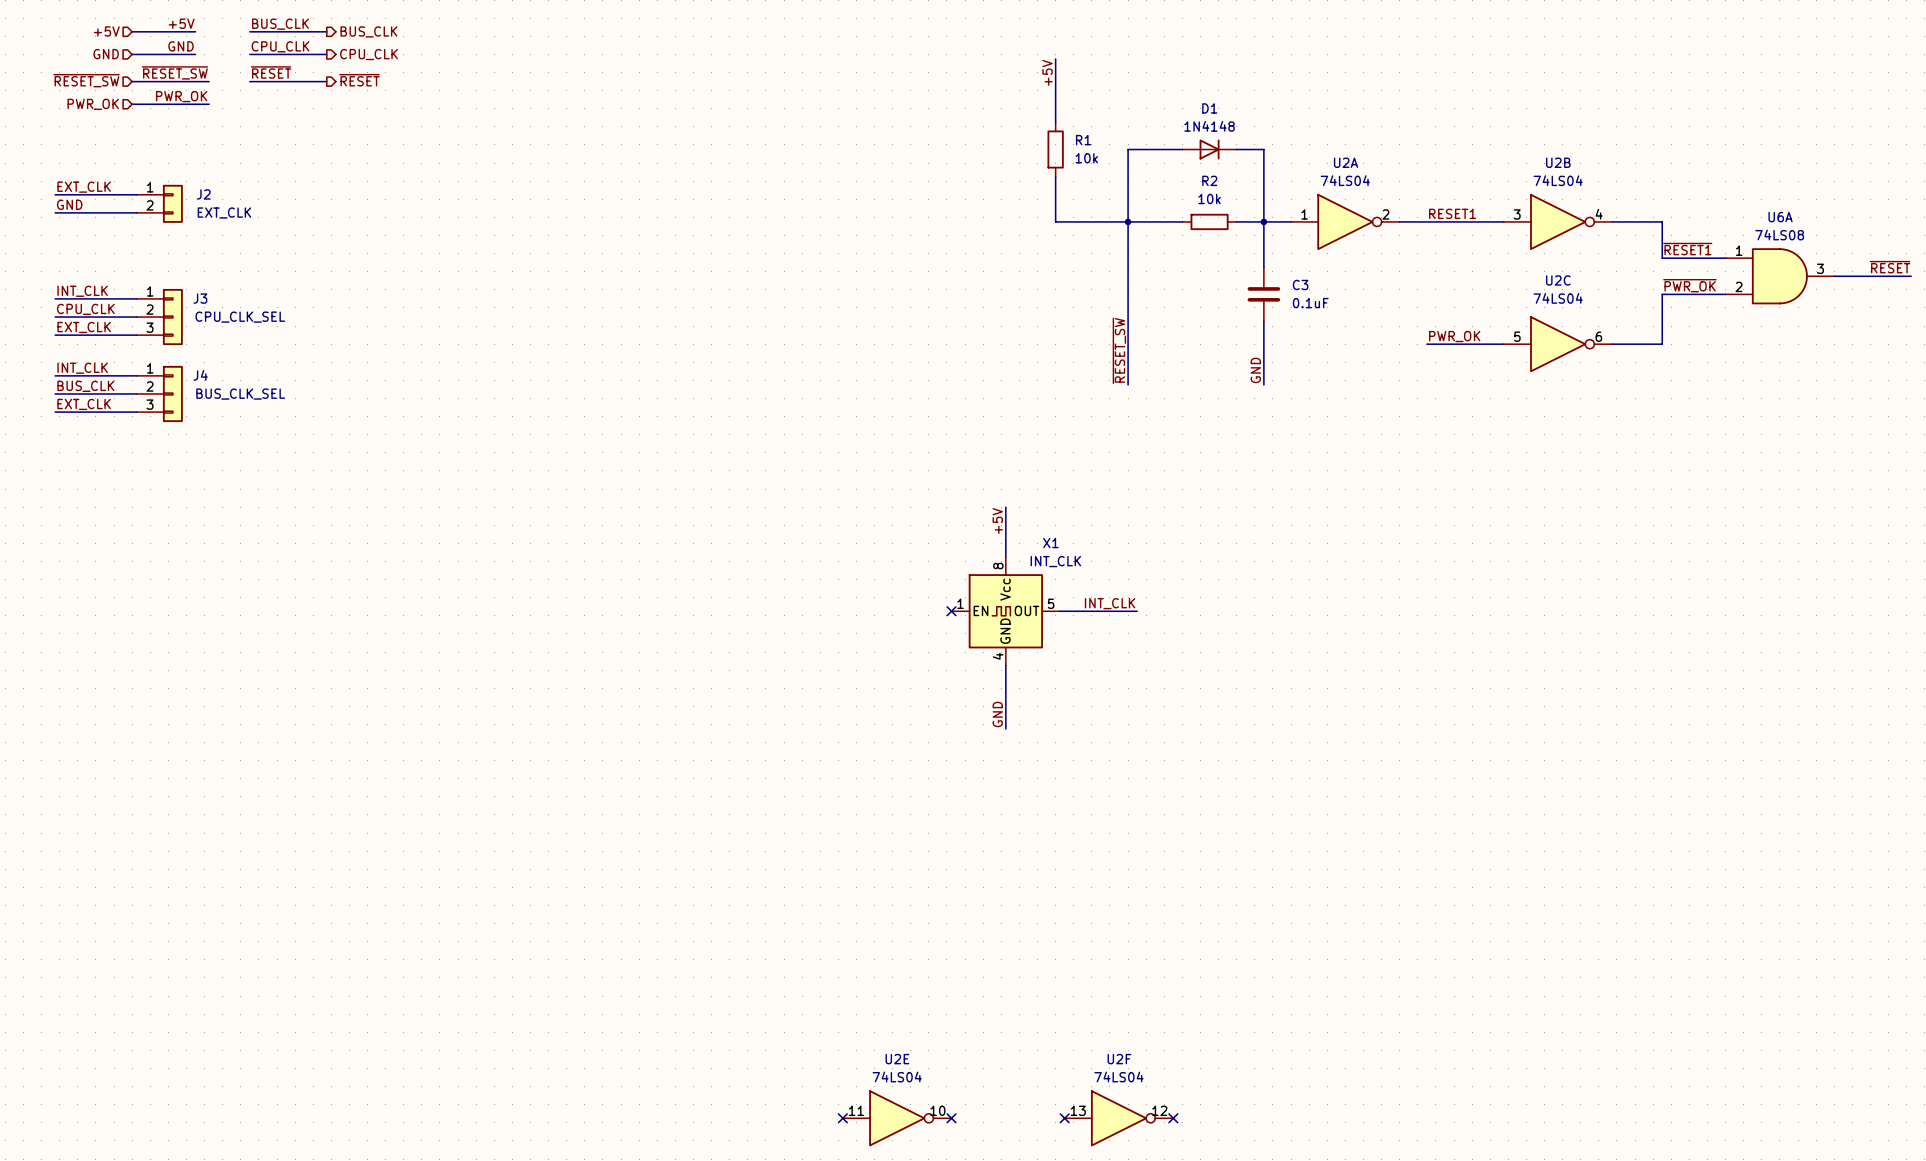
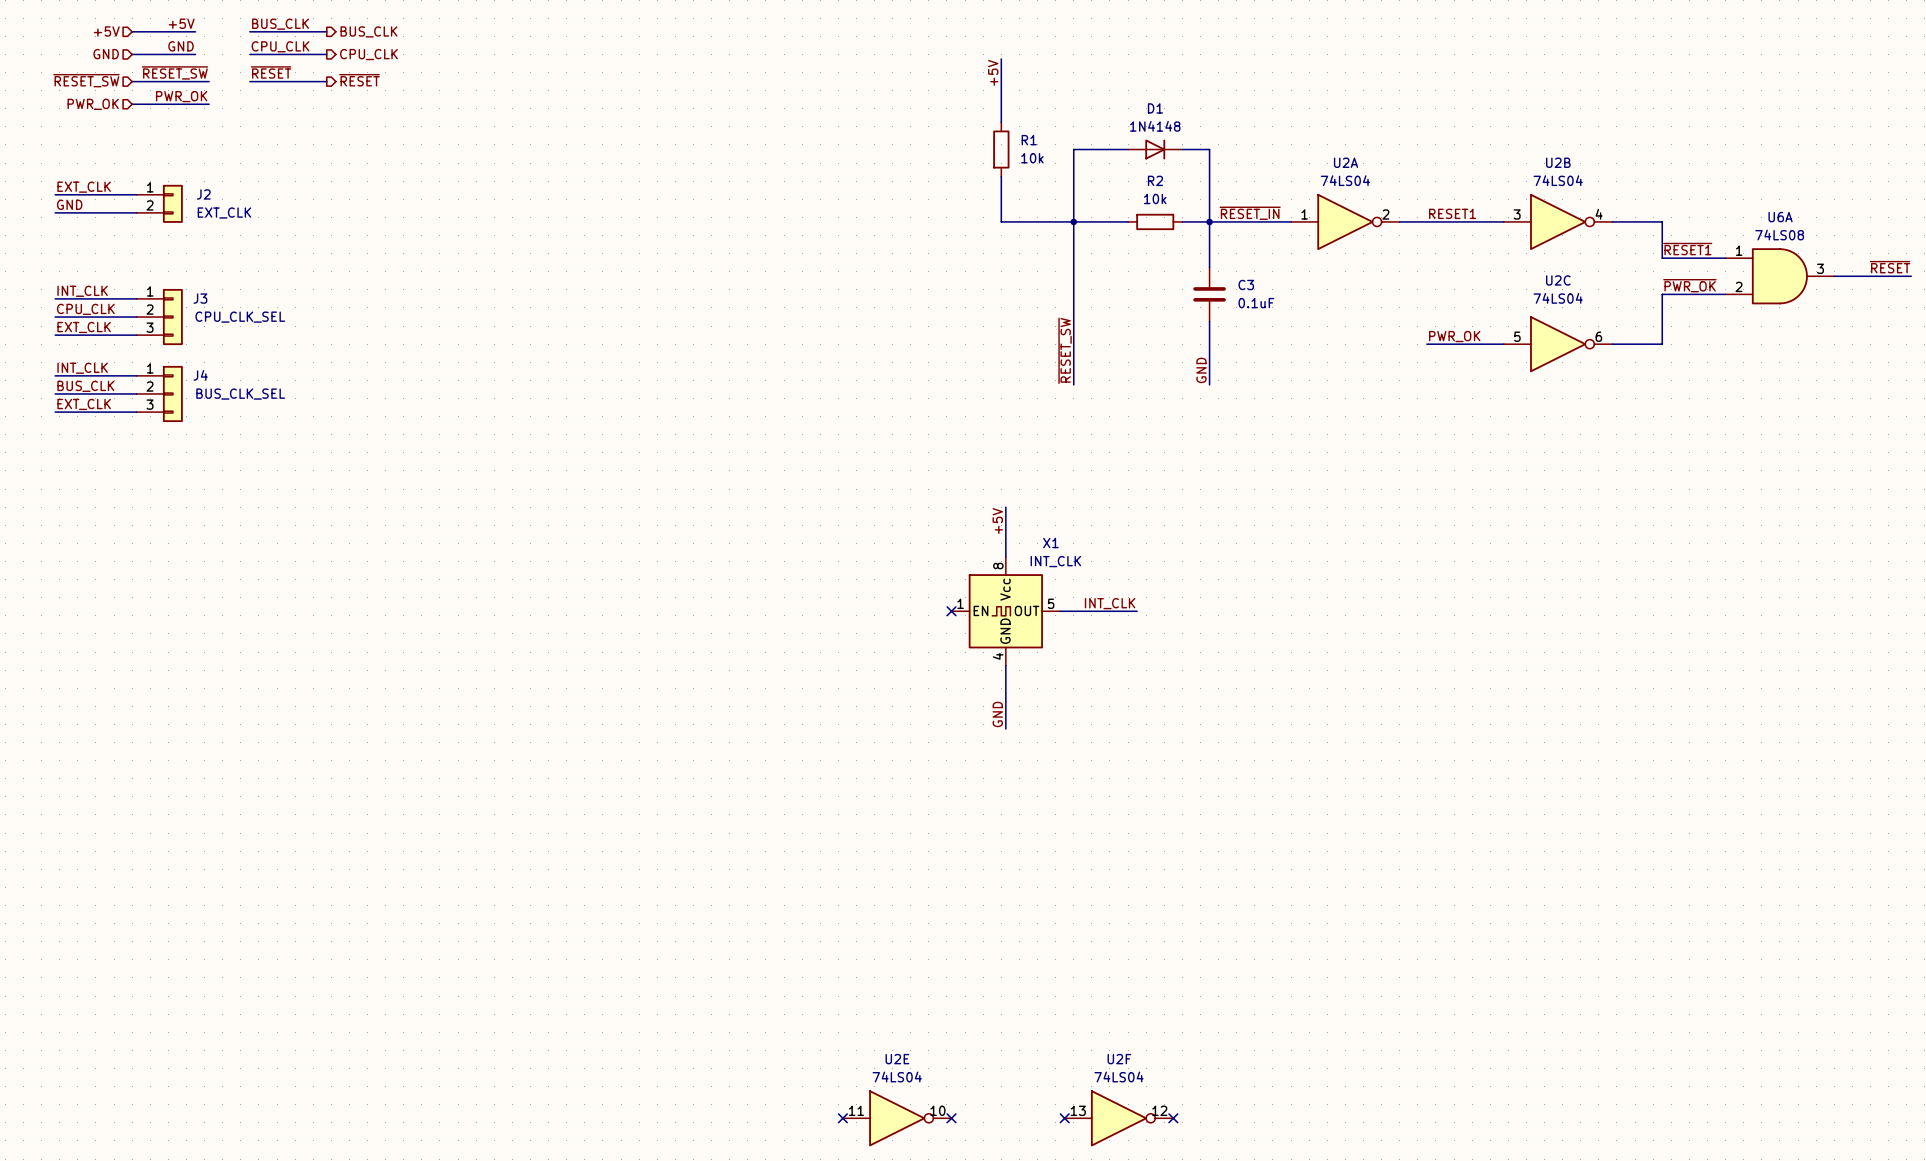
wire: (1055, 58) (1055, 122) -> (1001, 58) (1001, 122)
label position: +5V (1047, 72) -> +5V (993, 72)
R1 position: (1055, 149) -> (1001, 149)
wire: none -> (1128, 149) (1073, 149) (1073, 384)
wire: (1182, 149) (1128, 149) (1128, 384) -> (1182, 149) (1209, 149) (1209, 267)
D1 position: (1209, 149) -> (1155, 149)
wire: (1236, 149) (1263, 149) (1263, 267) -> none
wire: (1055, 176) (1055, 221) -> (1001, 176) (1001, 221) (1055, 221)
label: none -> ~{RESET_IN} (1250, 213)
junction: none -> (1073, 221)
wire: (1128, 221) (1182, 221) -> (1236, 221) (1182, 221)
junction: (1128, 221) -> none
junction: none -> (1209, 221)
R2 position: (1209, 221) -> (1155, 221)
junction: (1263, 221) -> none
C3 position: (1263, 294) -> (1209, 294)
wire: (1263, 321) (1263, 384) -> (1209, 321) (1209, 384)
label position: ~{RESET_SW} (1119, 350) -> ~{RESET_SW} (1065, 350)
label position: GND (1255, 370) -> GND (1201, 370)

